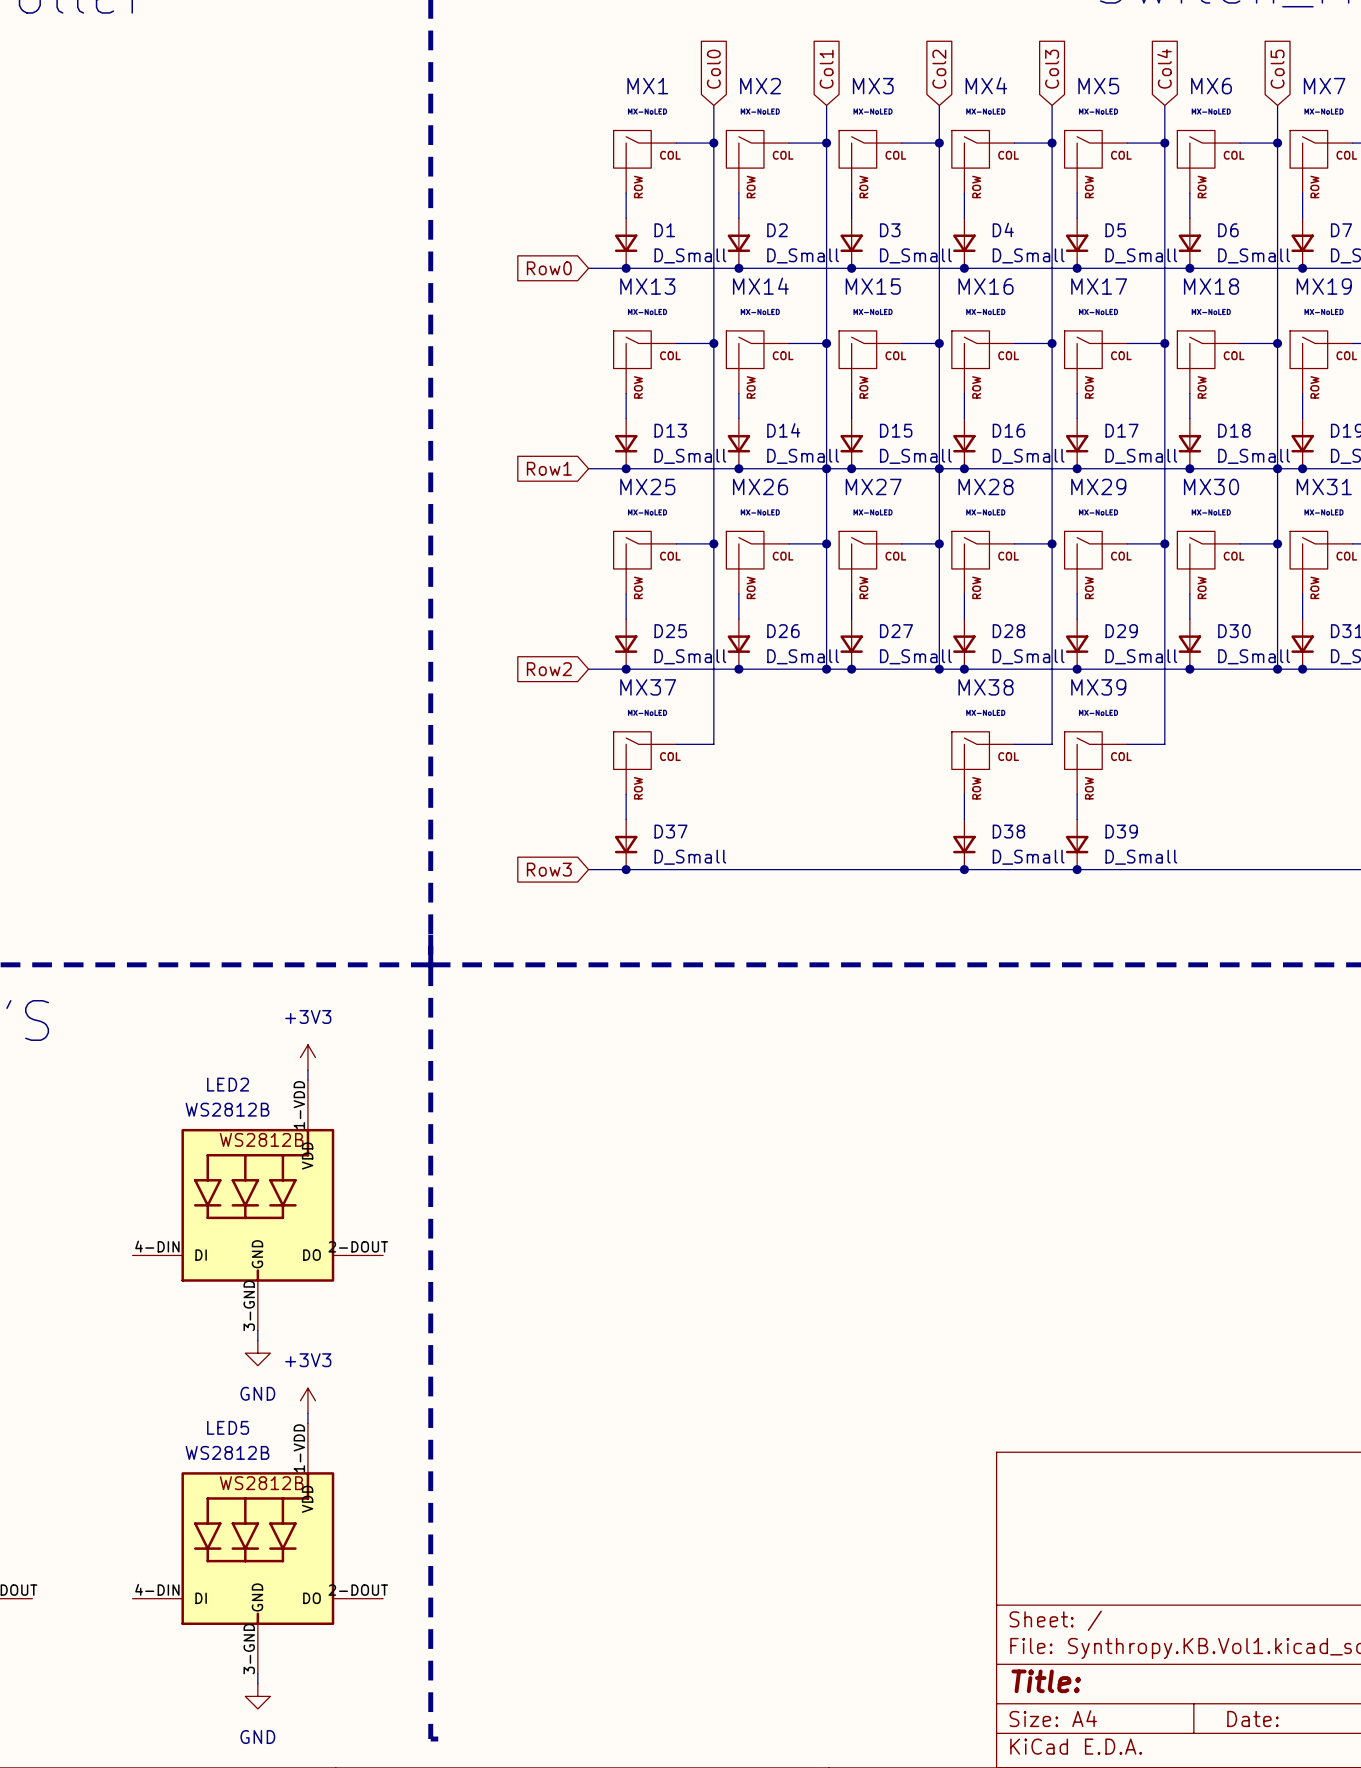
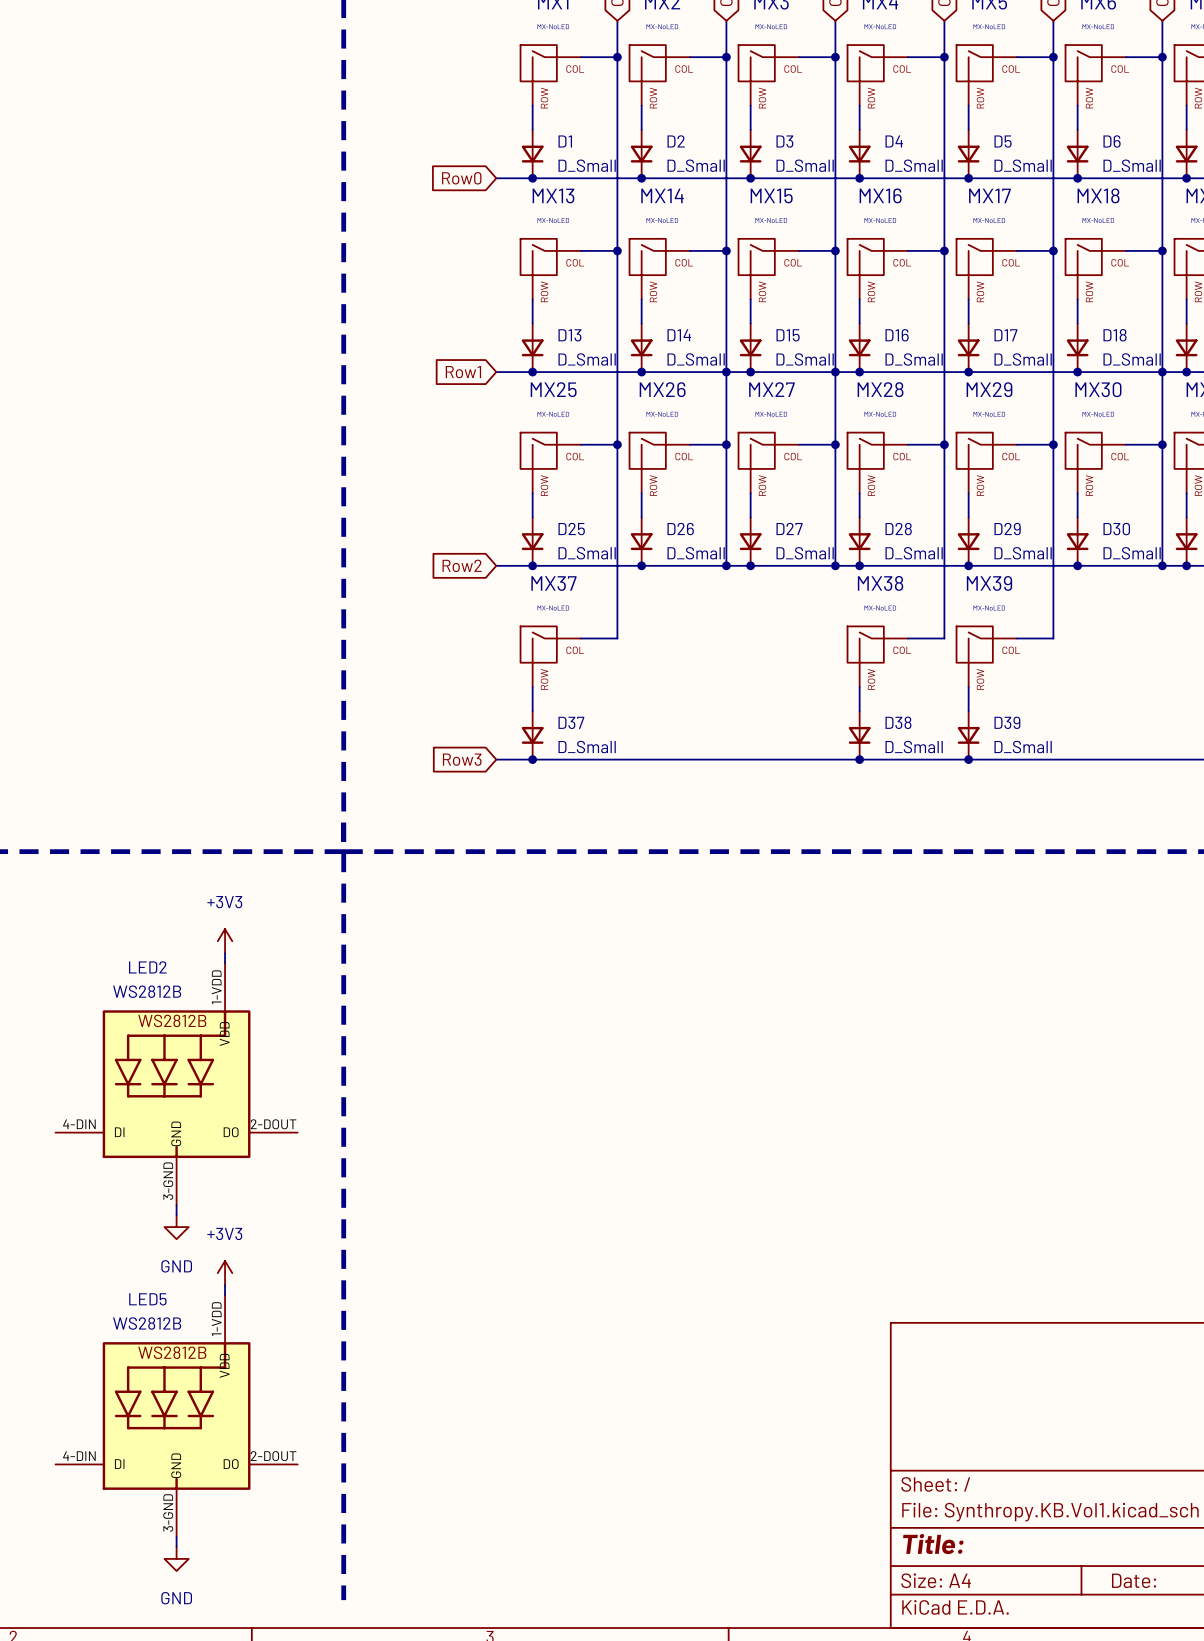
line: (430, 1739) (438, 1739) -> none

